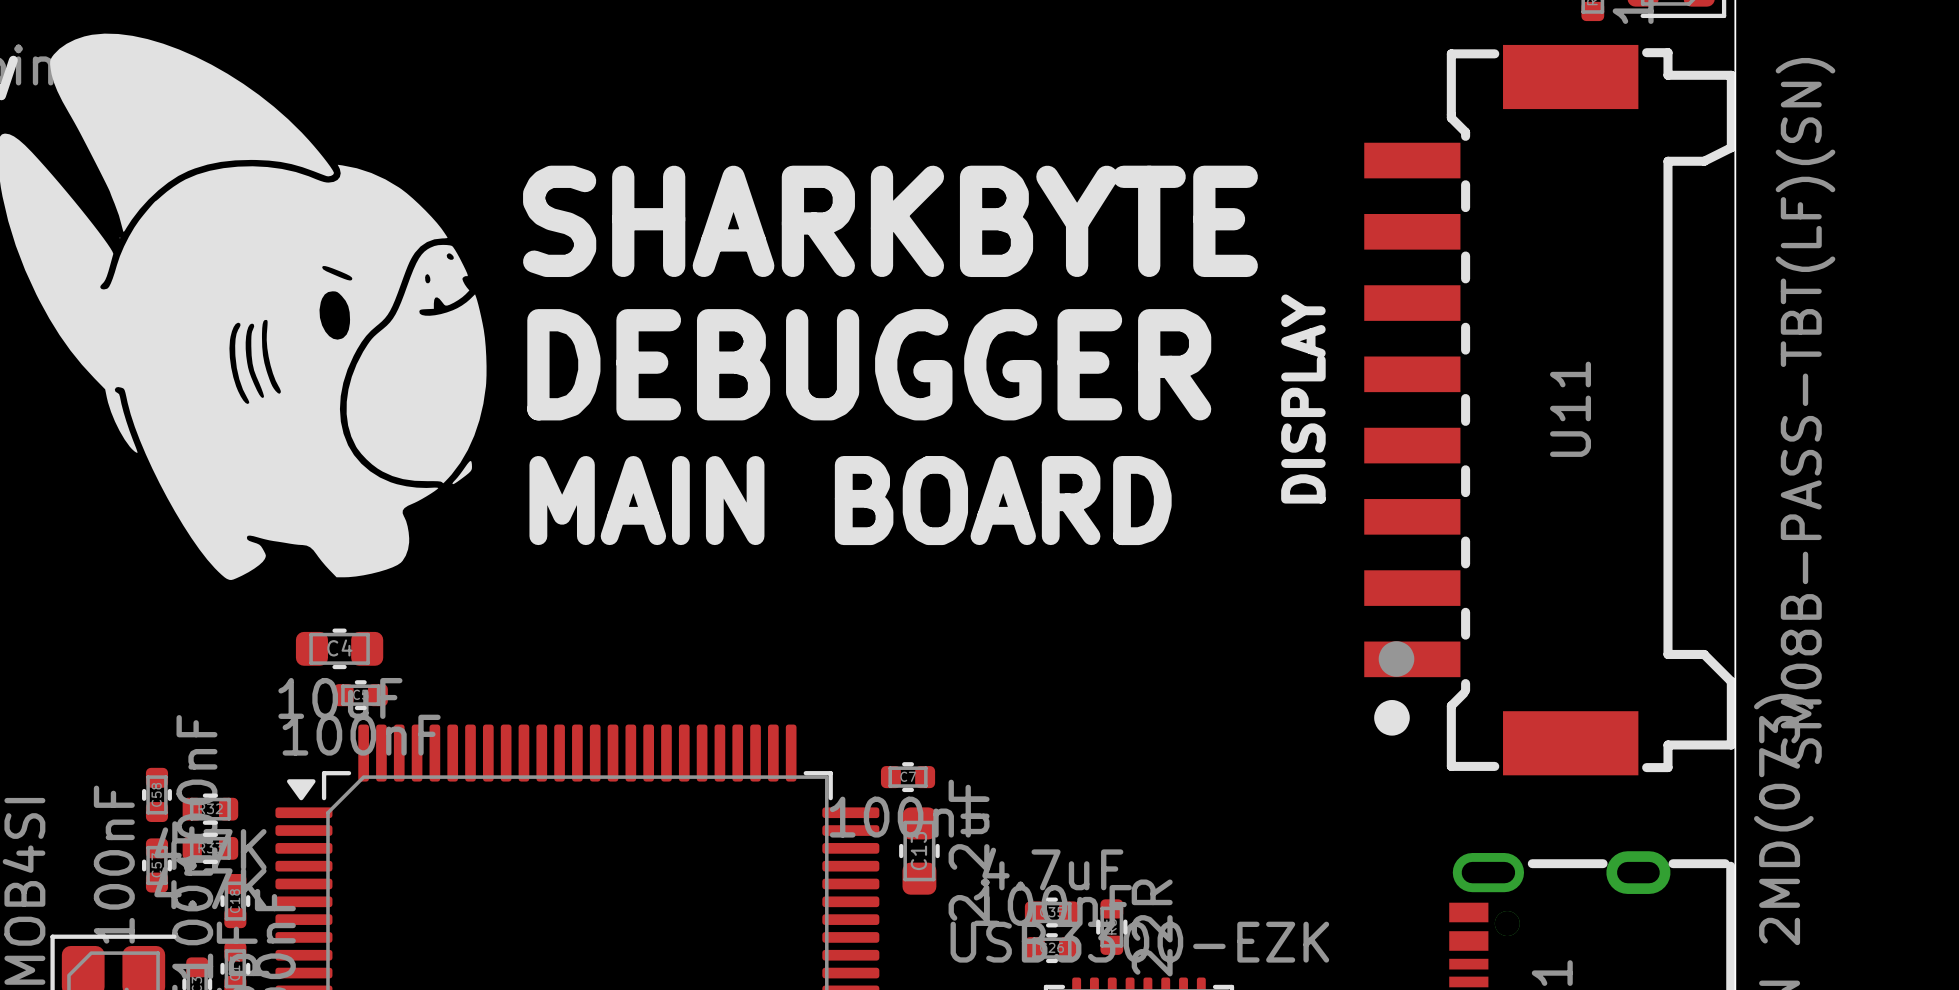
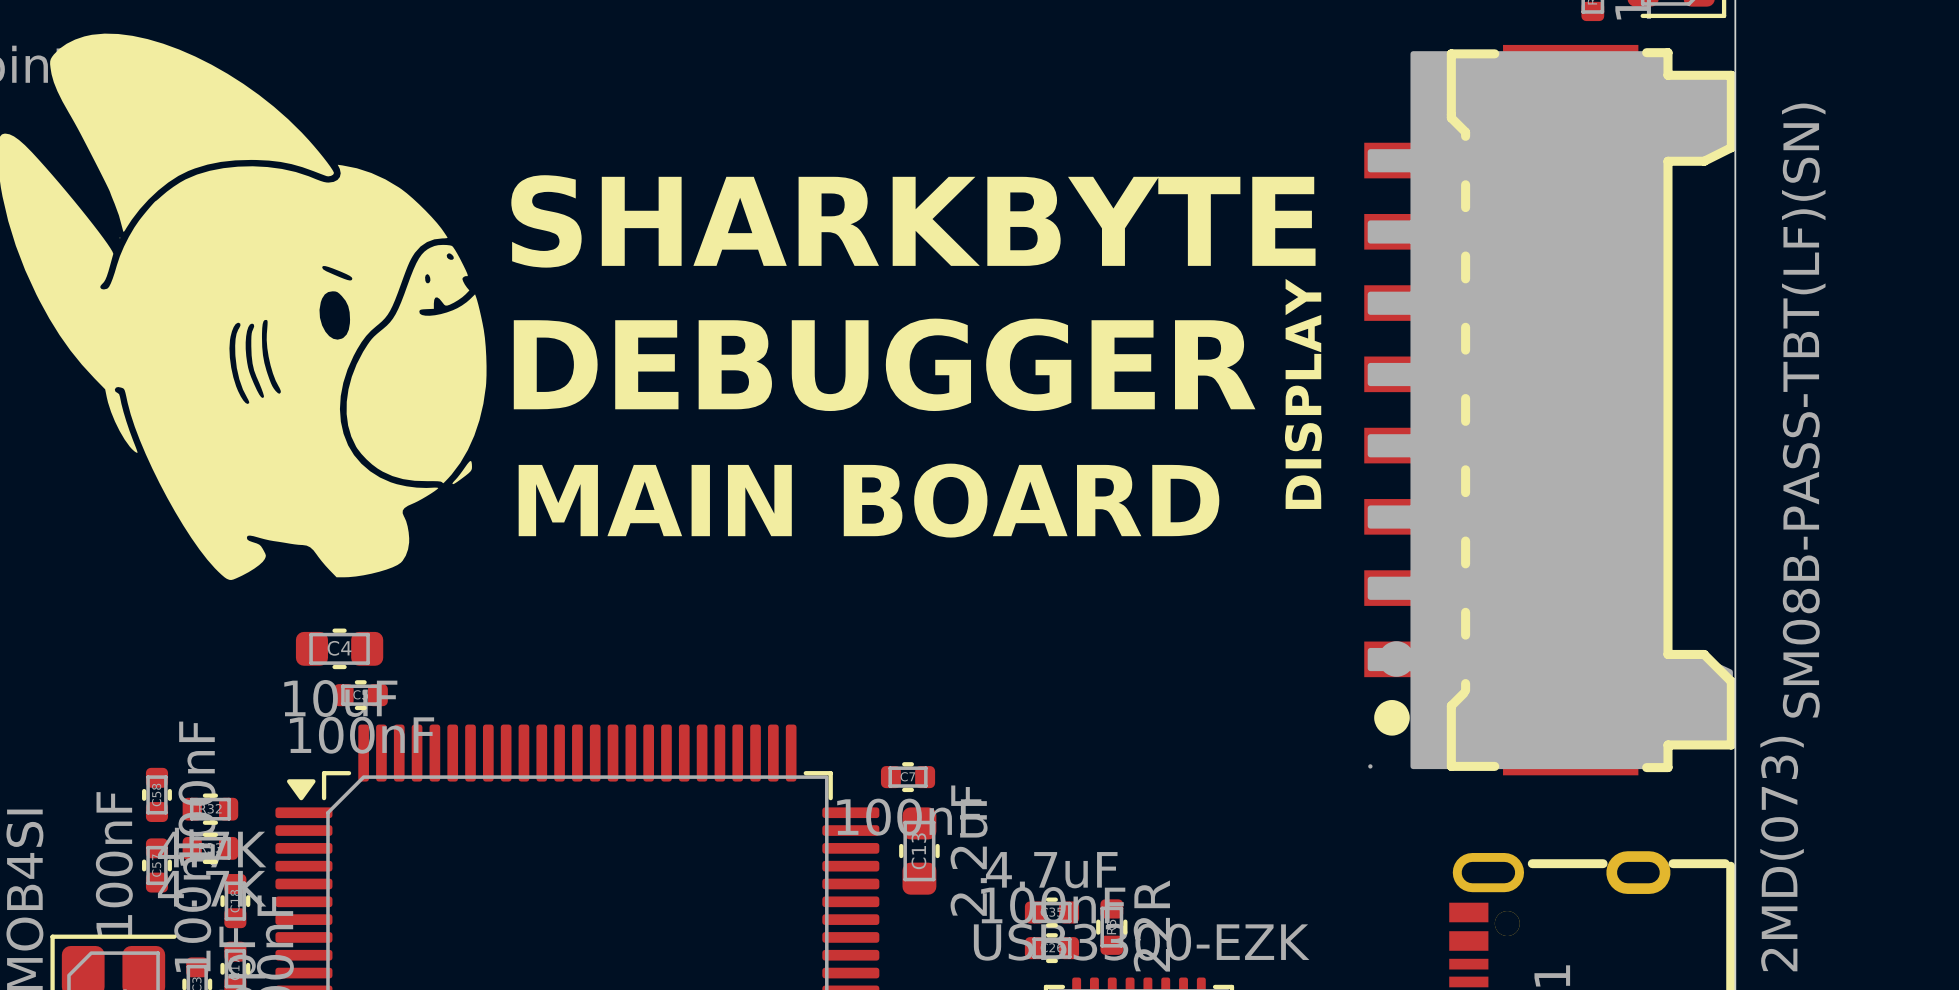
U11 footprint: [1364, 44, 1736, 776] -> [1364, 44, 1736, 776]

